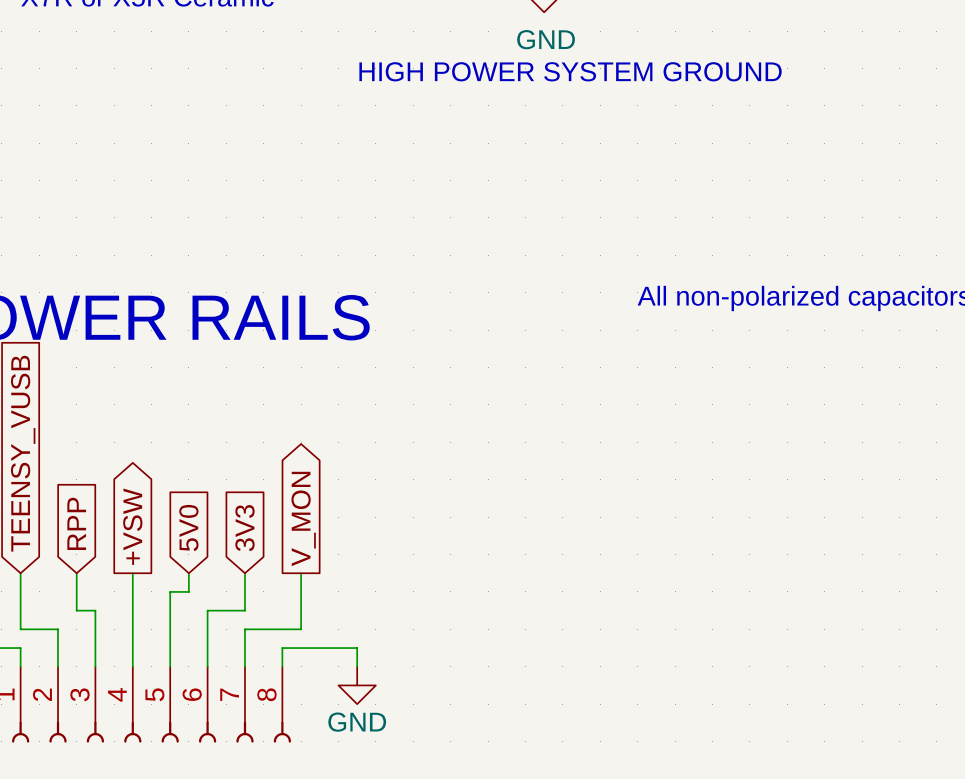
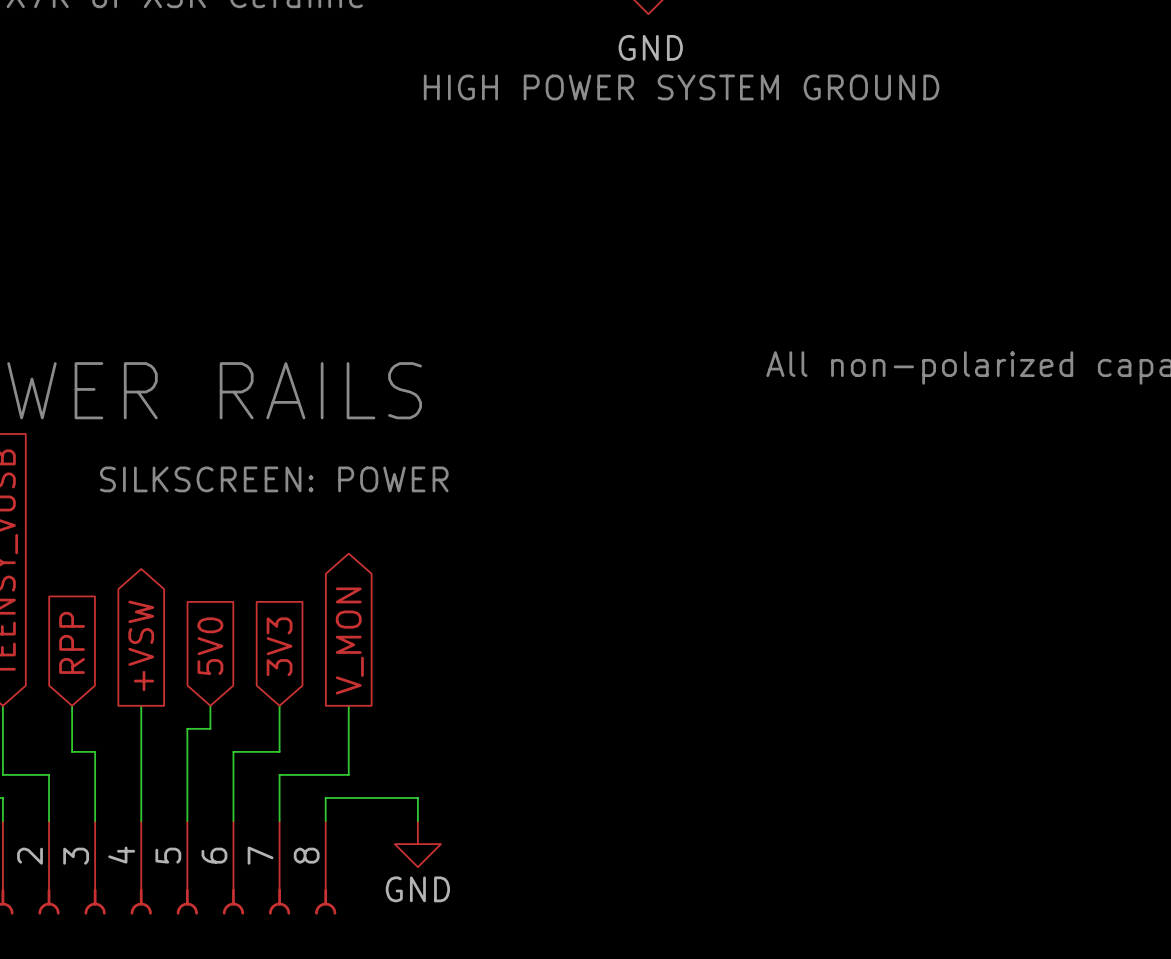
text: none -> SILKSCREEN: POWER (274, 479)

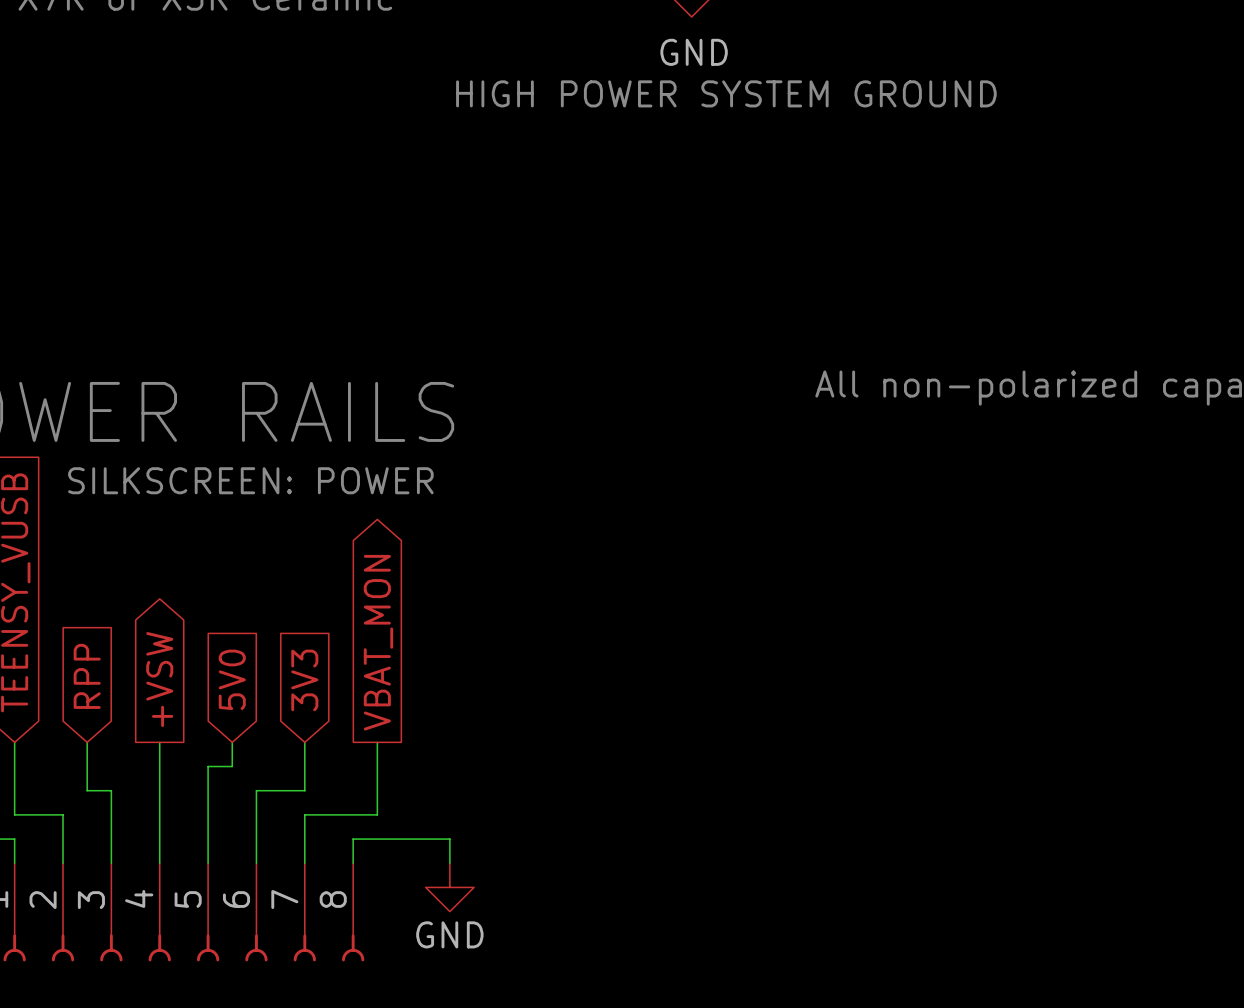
text position: SILKSCREEN: POWER (274, 479) -> SILKSCREEN: POWER (250, 480)
global label: V_MON (349, 640) -> VBAT_MON (378, 642)

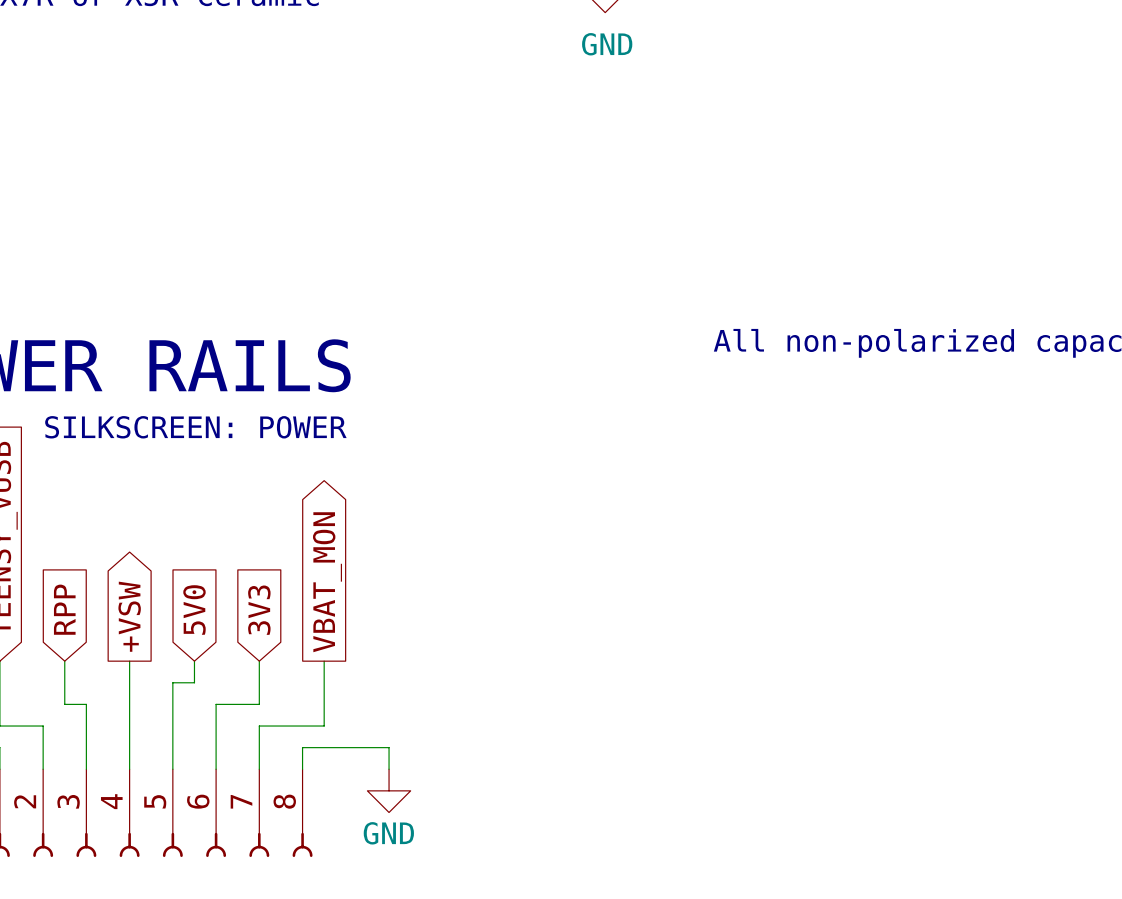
text: HIGH POWER SYSTEM GROUND (726, 93) -> none

